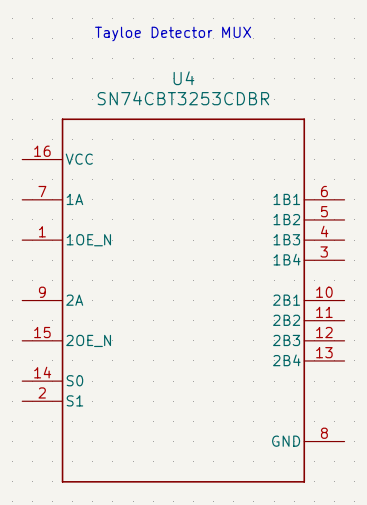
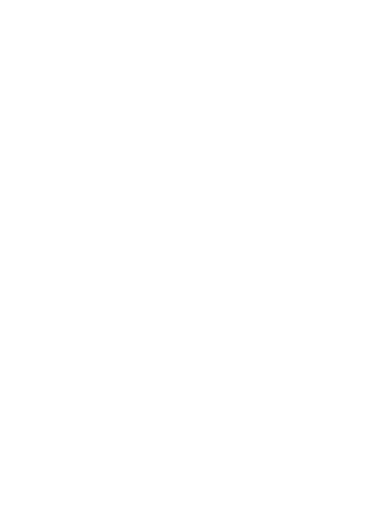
text: Tayloe Detector MUX (173, 33) -> none
U4: SN74CBT3253CDBR (183, 300) -> none

